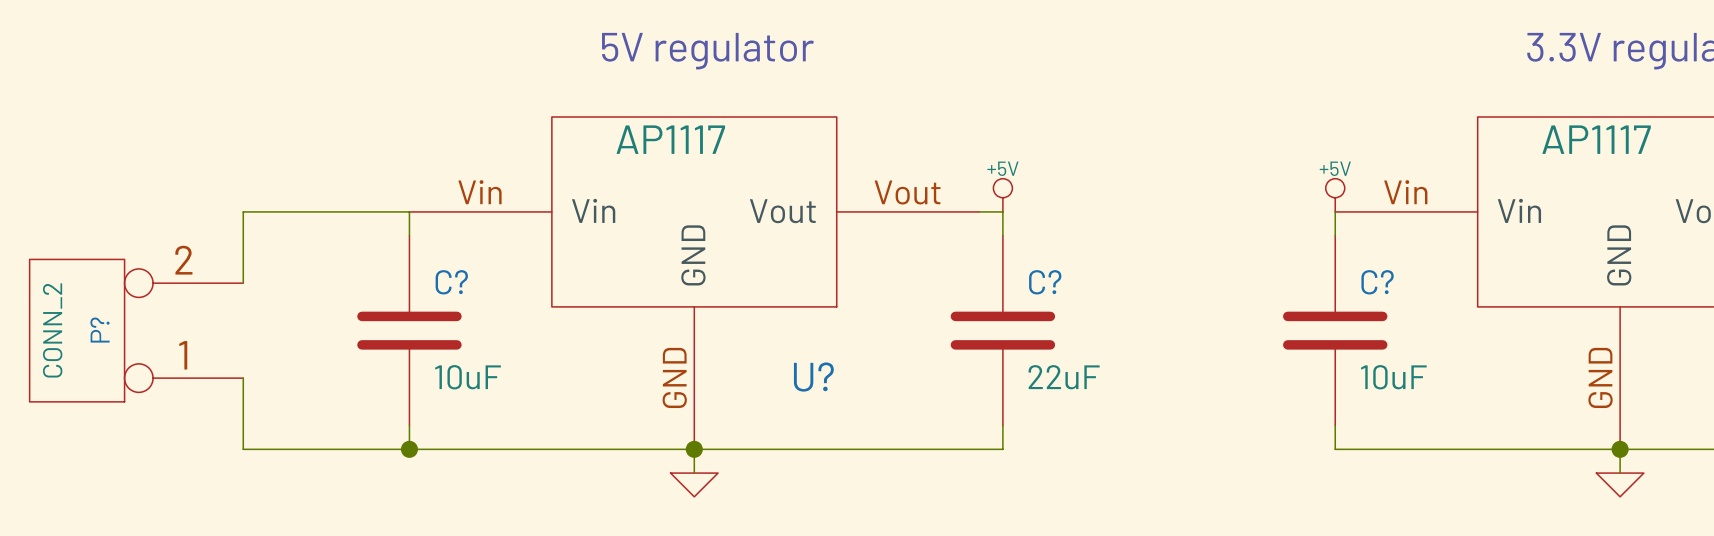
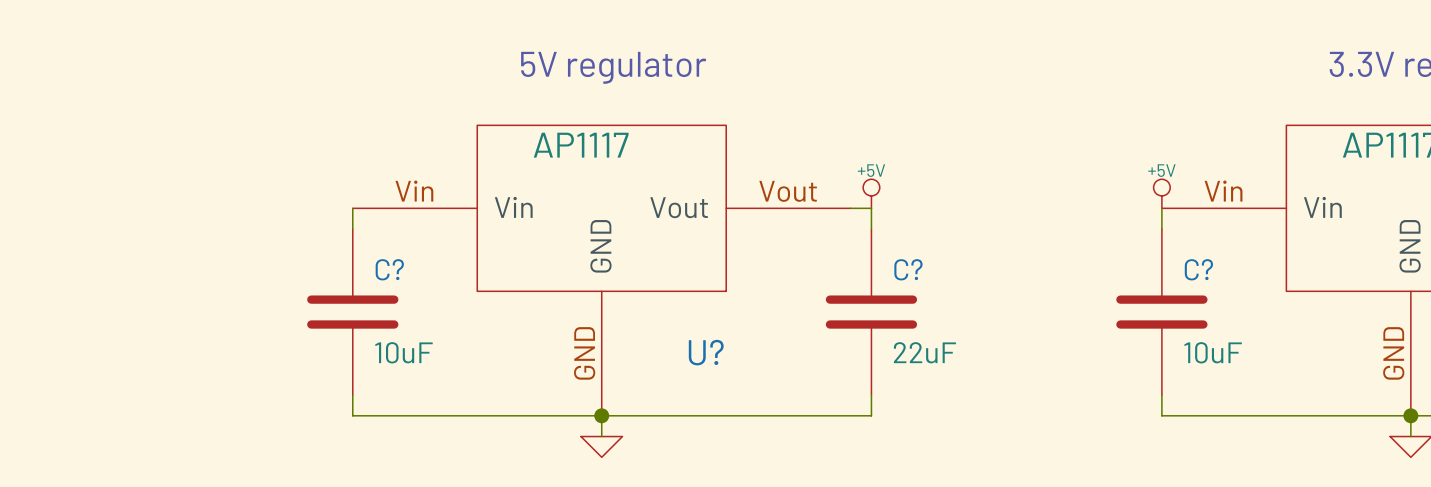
wire: (409, 211) (243, 211) (243, 283) -> none
P?: CONN_2 (136, 330) -> none
wire: (243, 378) (243, 449) (409, 449) -> none
junction: (409, 449) -> none

